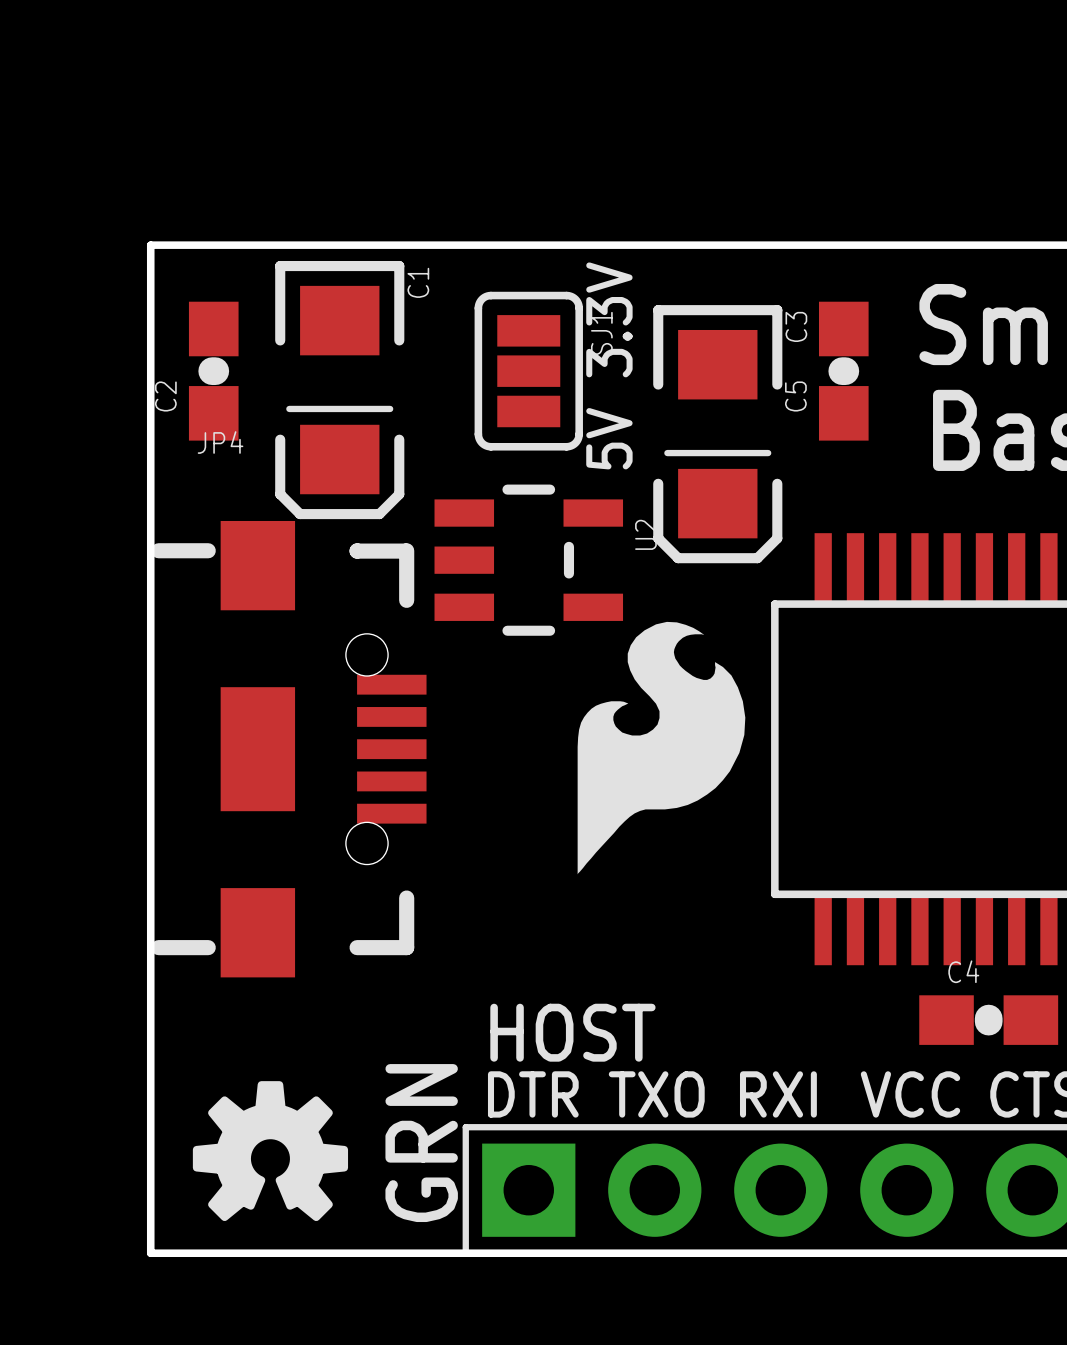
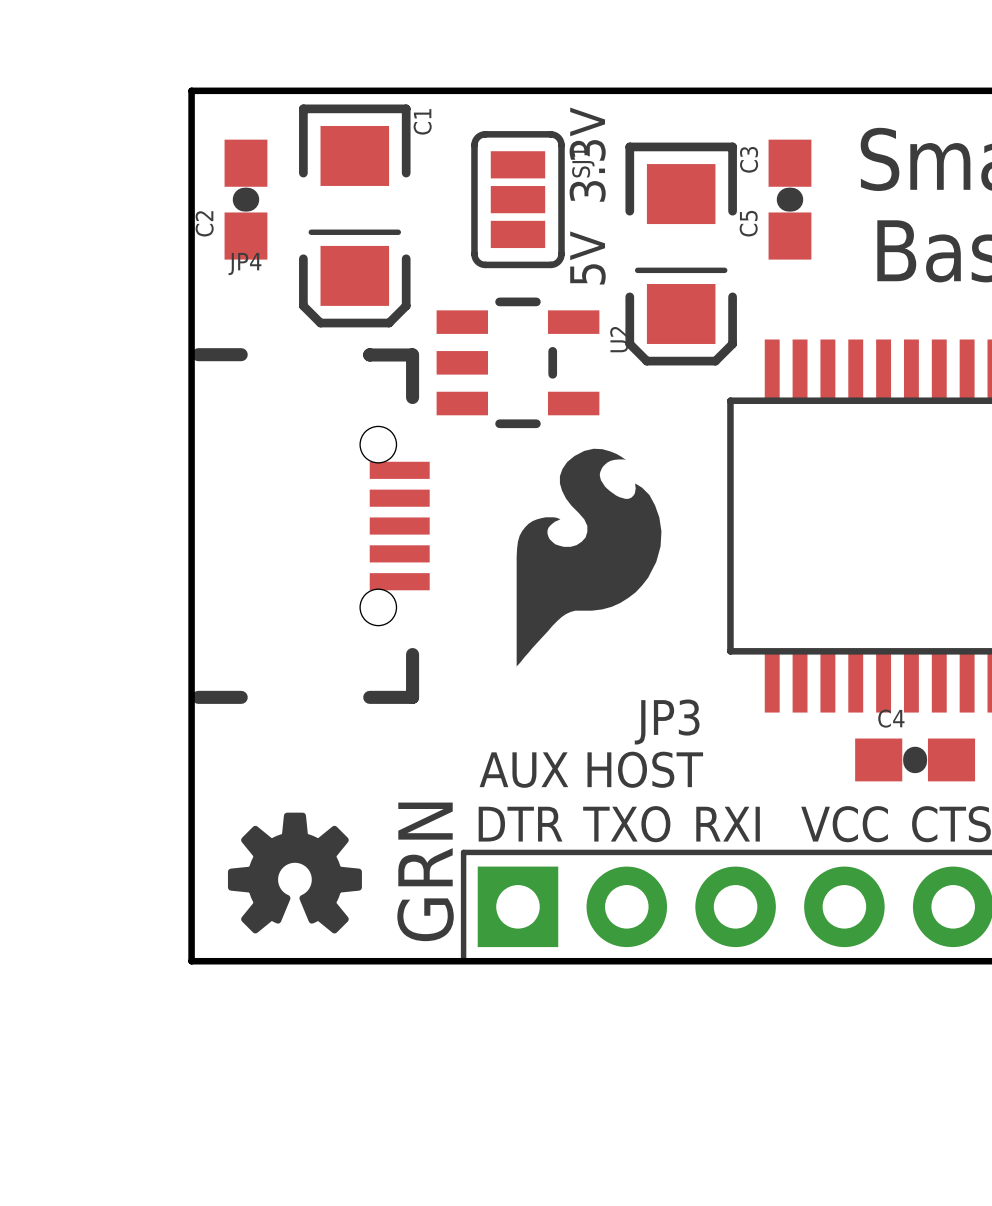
JP4 footprint: [151, 520, 427, 978] -> [191, 348, 430, 704]
drawing position: (661, 748) -> (589, 557)
text: none -> JP3 (667, 721)
text: HOST (572, 1032) -> AUX HOST (591, 769)

